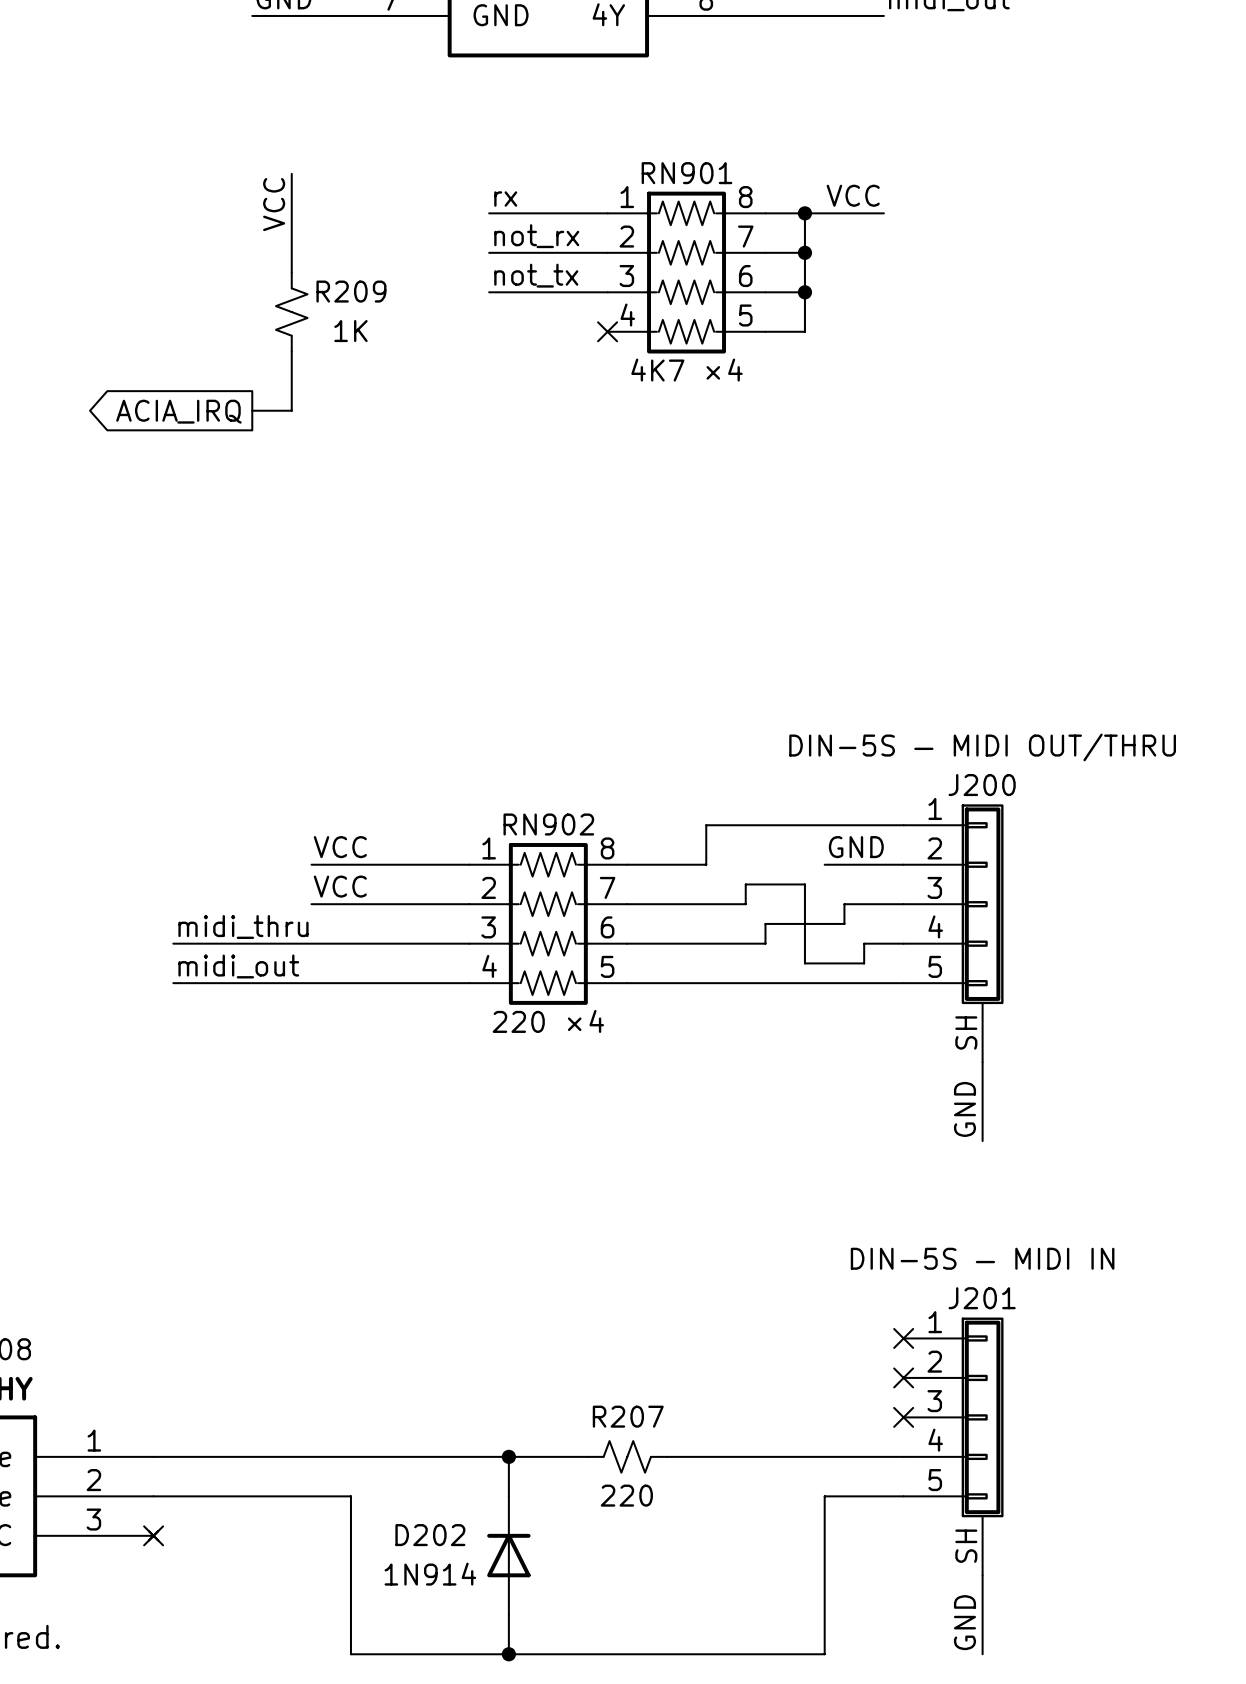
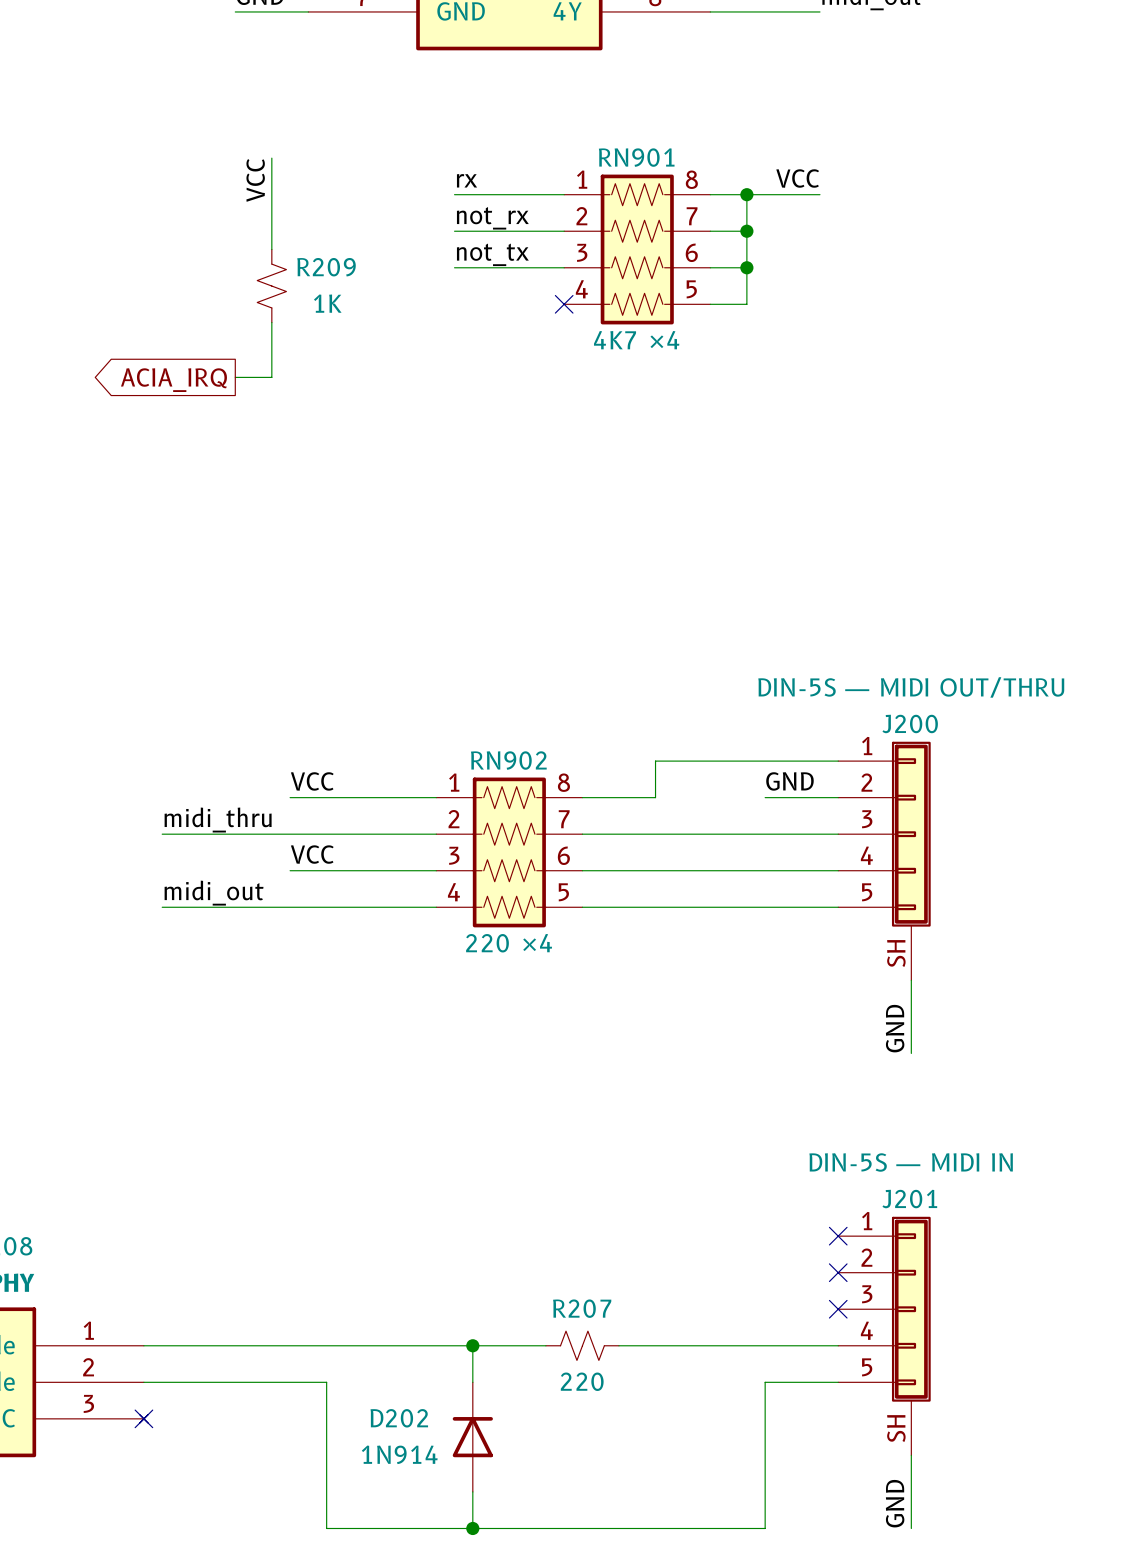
label position: VCC (340, 886) -> VCC (312, 854)
wire: (745, 904) (745, 884) (804, 884) (804, 963) (864, 963) (864, 943) -> (692, 834) (783, 834)
wire: (844, 904) (844, 923) (765, 923) (765, 943) -> (801, 870) (710, 870)
label position: midi_thru (243, 927) -> midi_thru (218, 820)
wire: (173, 943) (311, 943) -> (162, 834) (290, 834)

